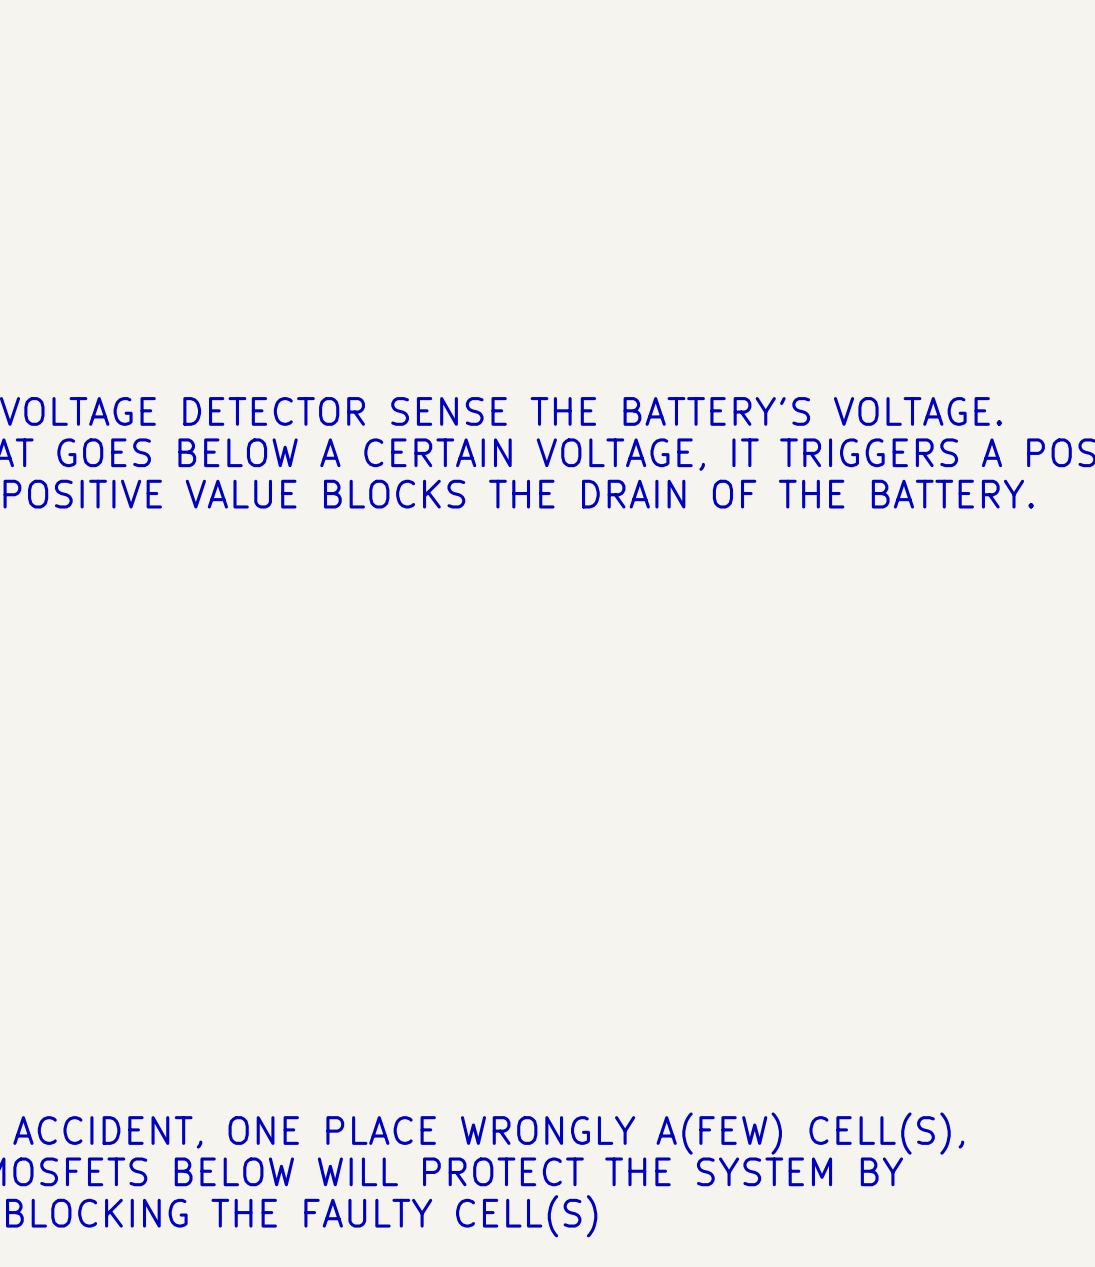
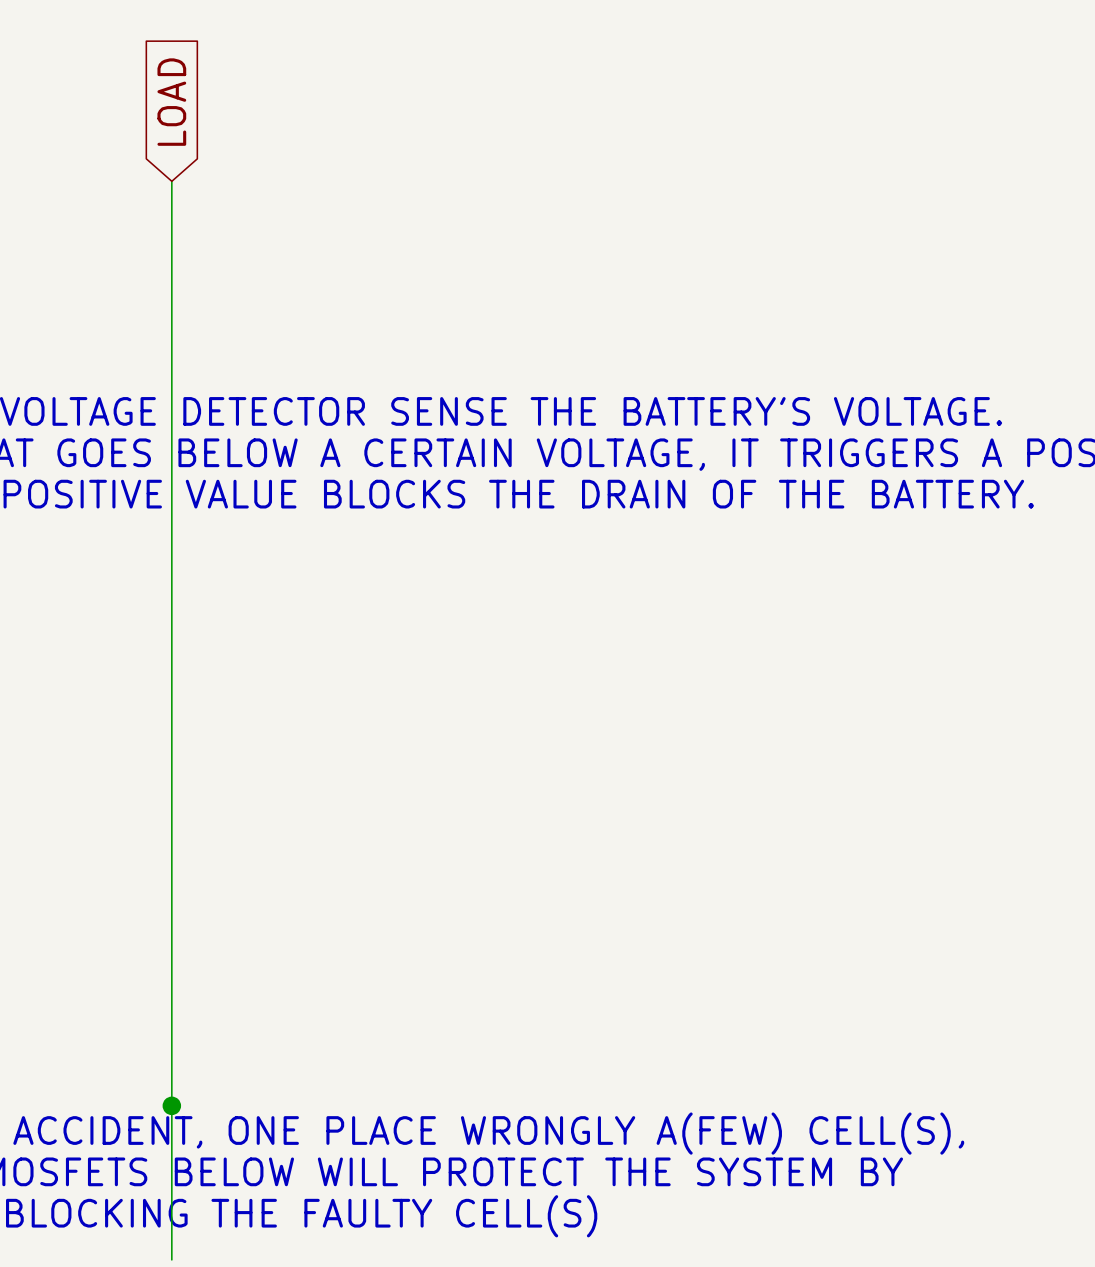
global label: none -> LOAD (171, 102)
wire: none -> (171, 181) (171, 1259)
junction: none -> (171, 1105)

